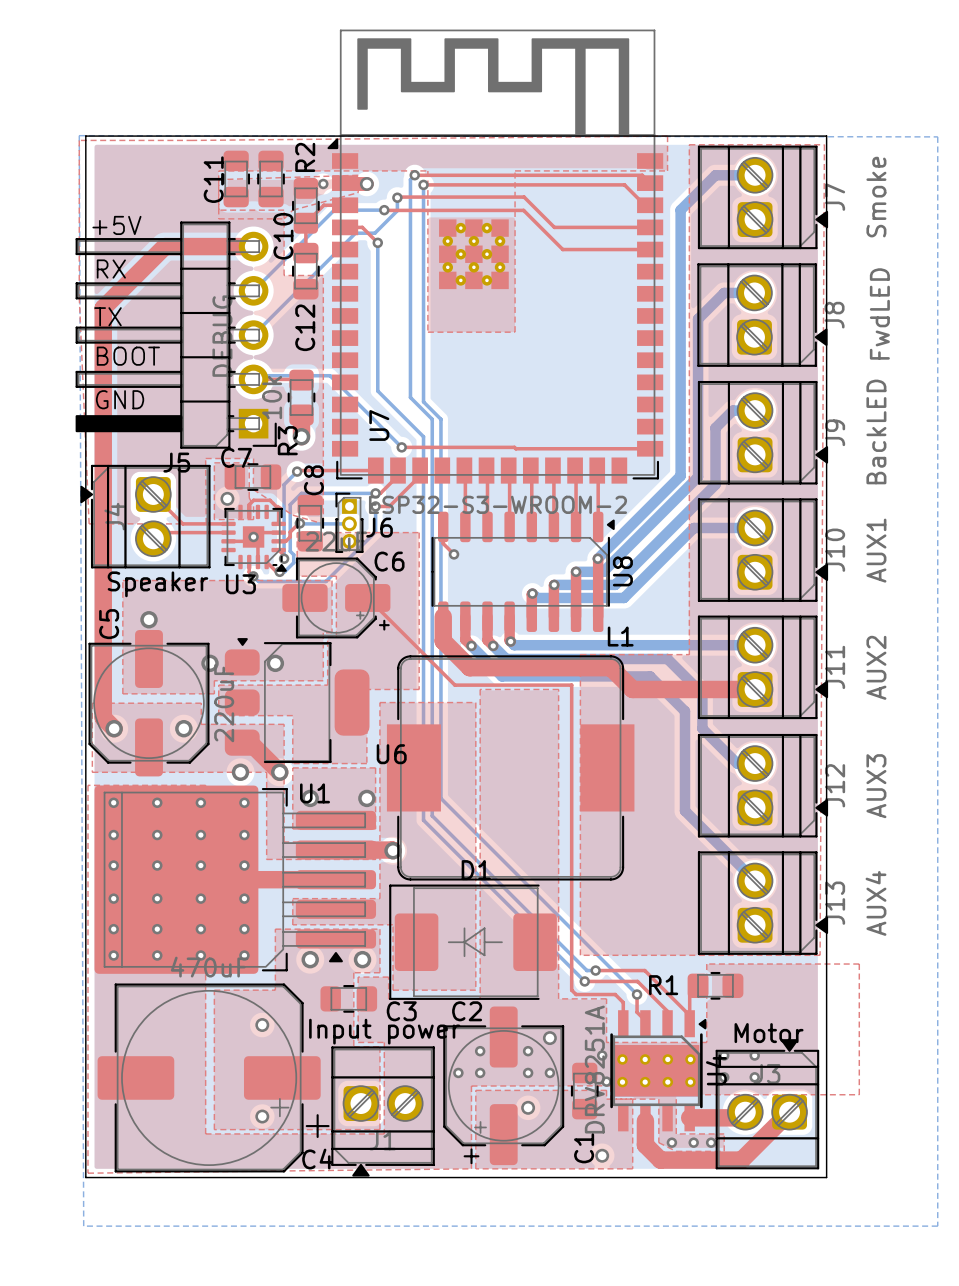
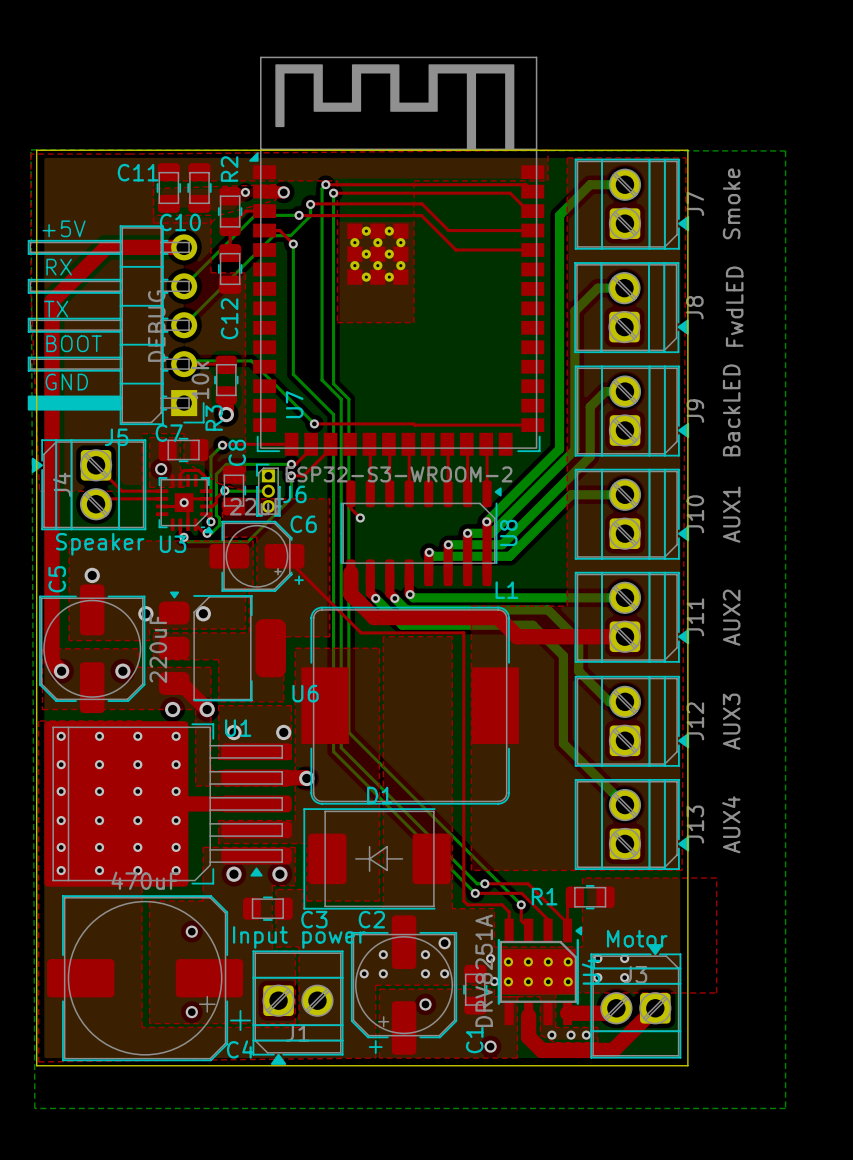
C11 name rotation: 0° (213, 179) -> 90° clockwise (138, 172)
C10 name rotation: 0° (283, 236) -> 90° clockwise (180, 222)

